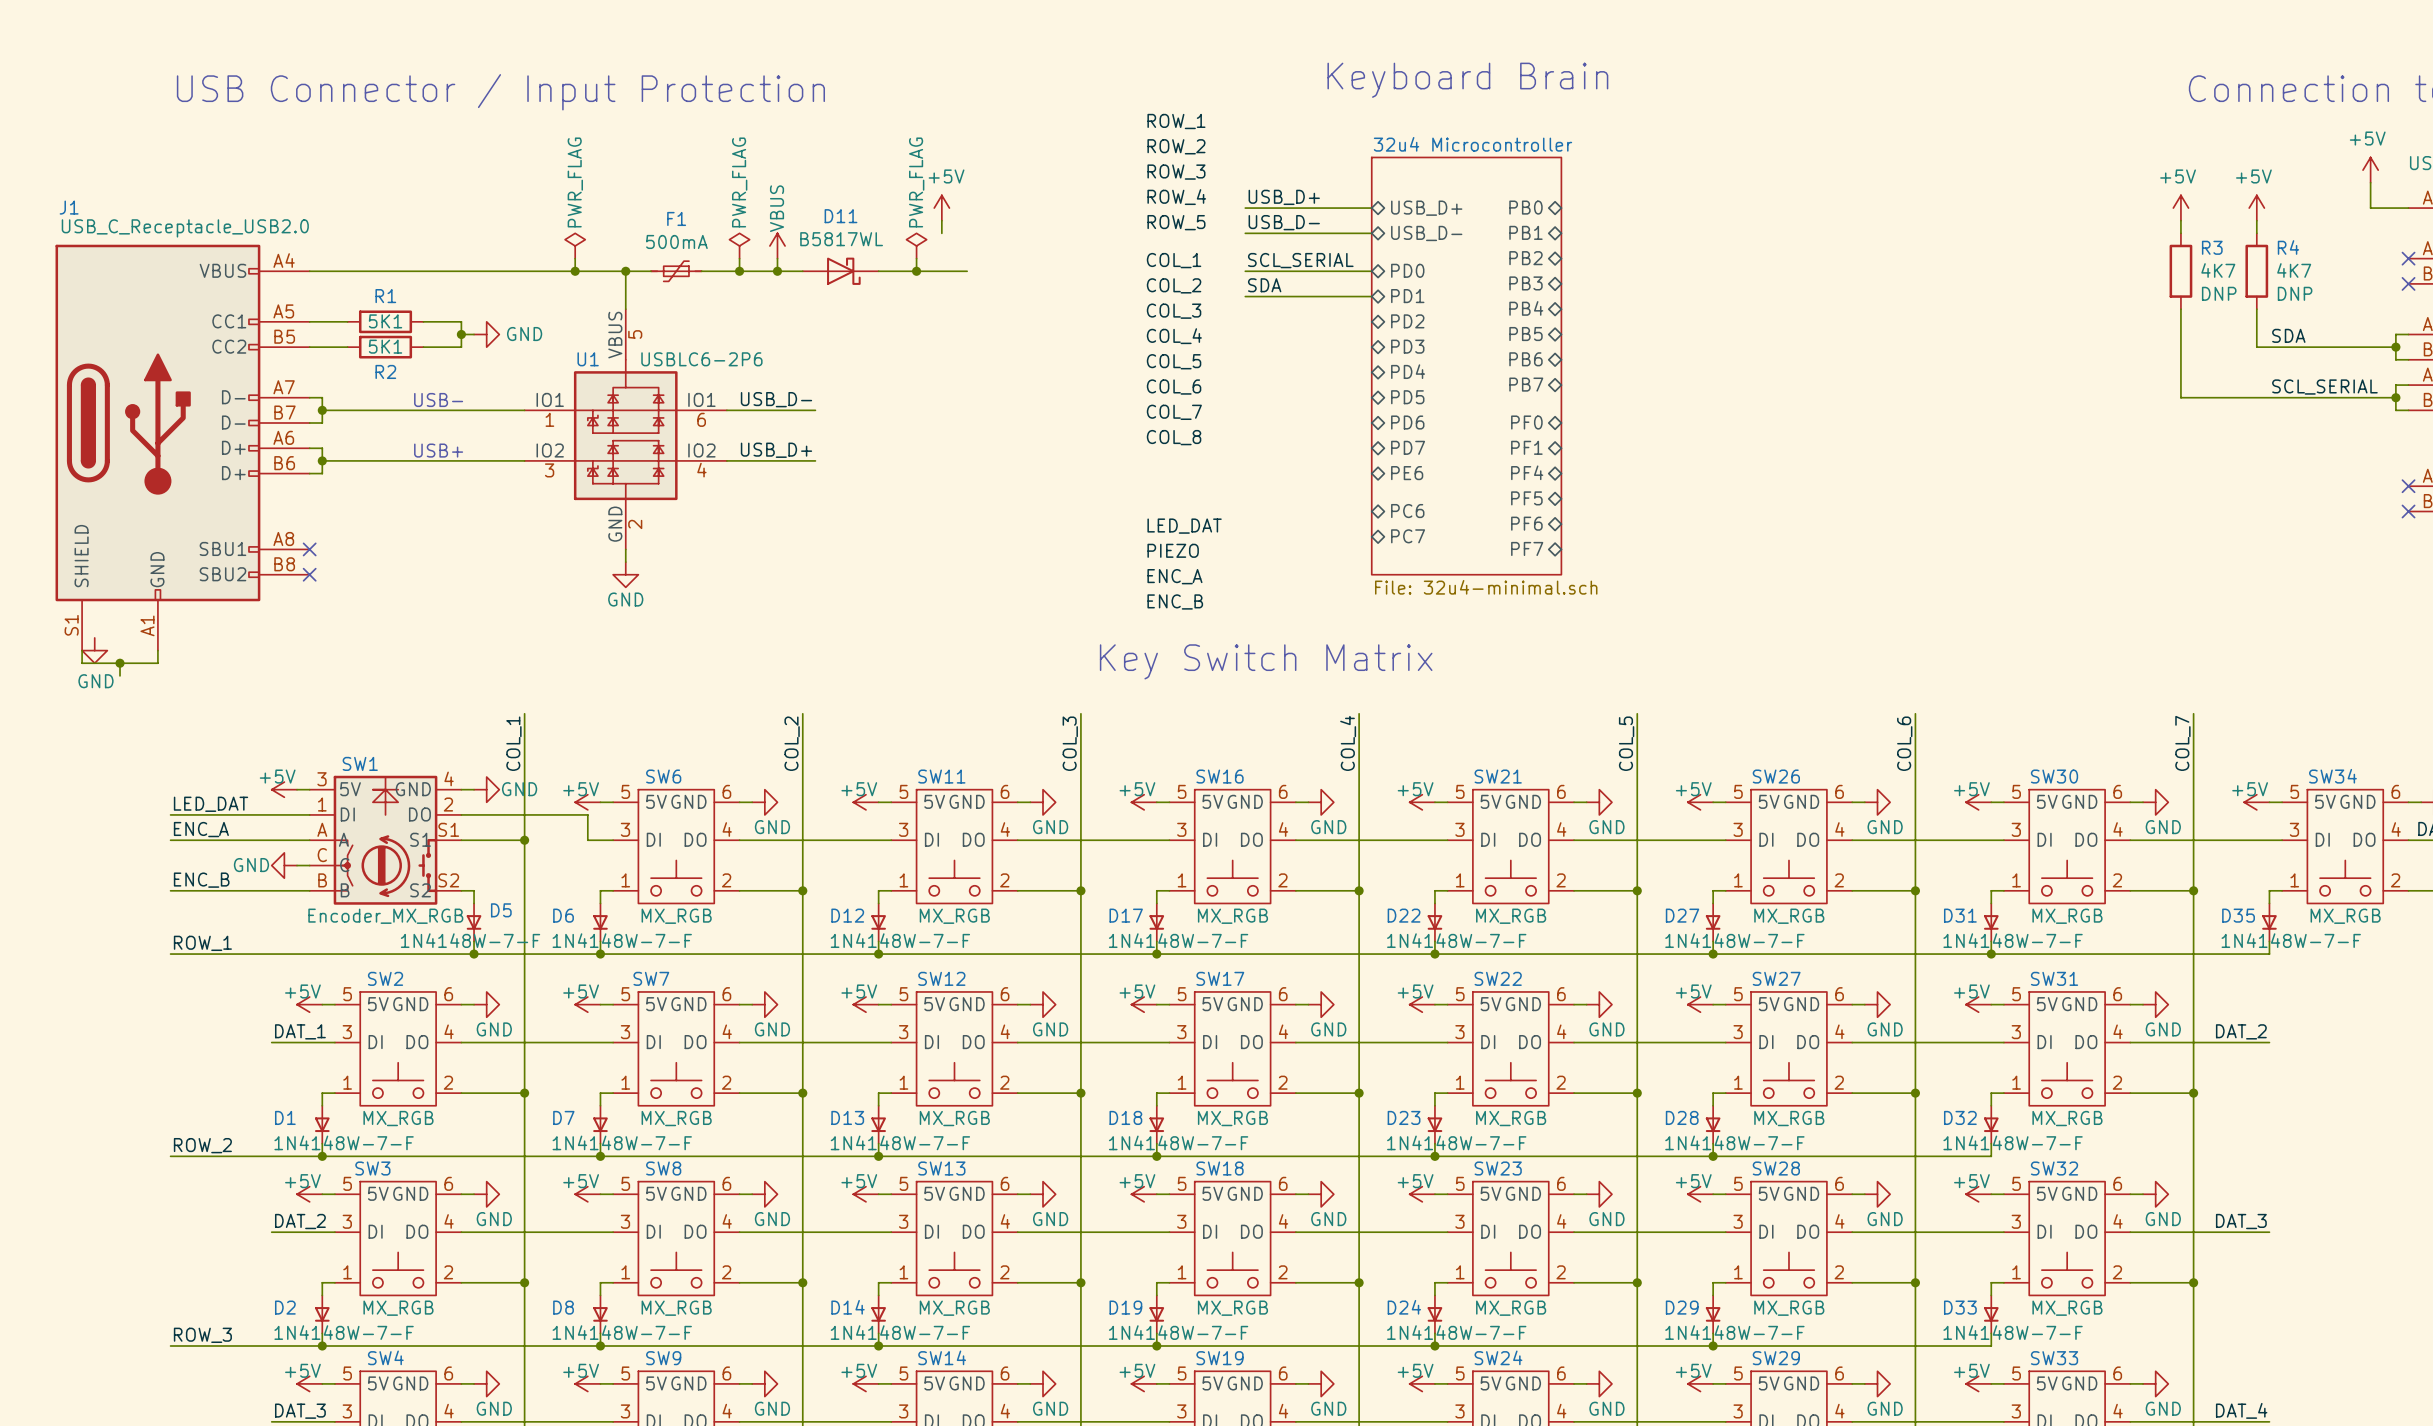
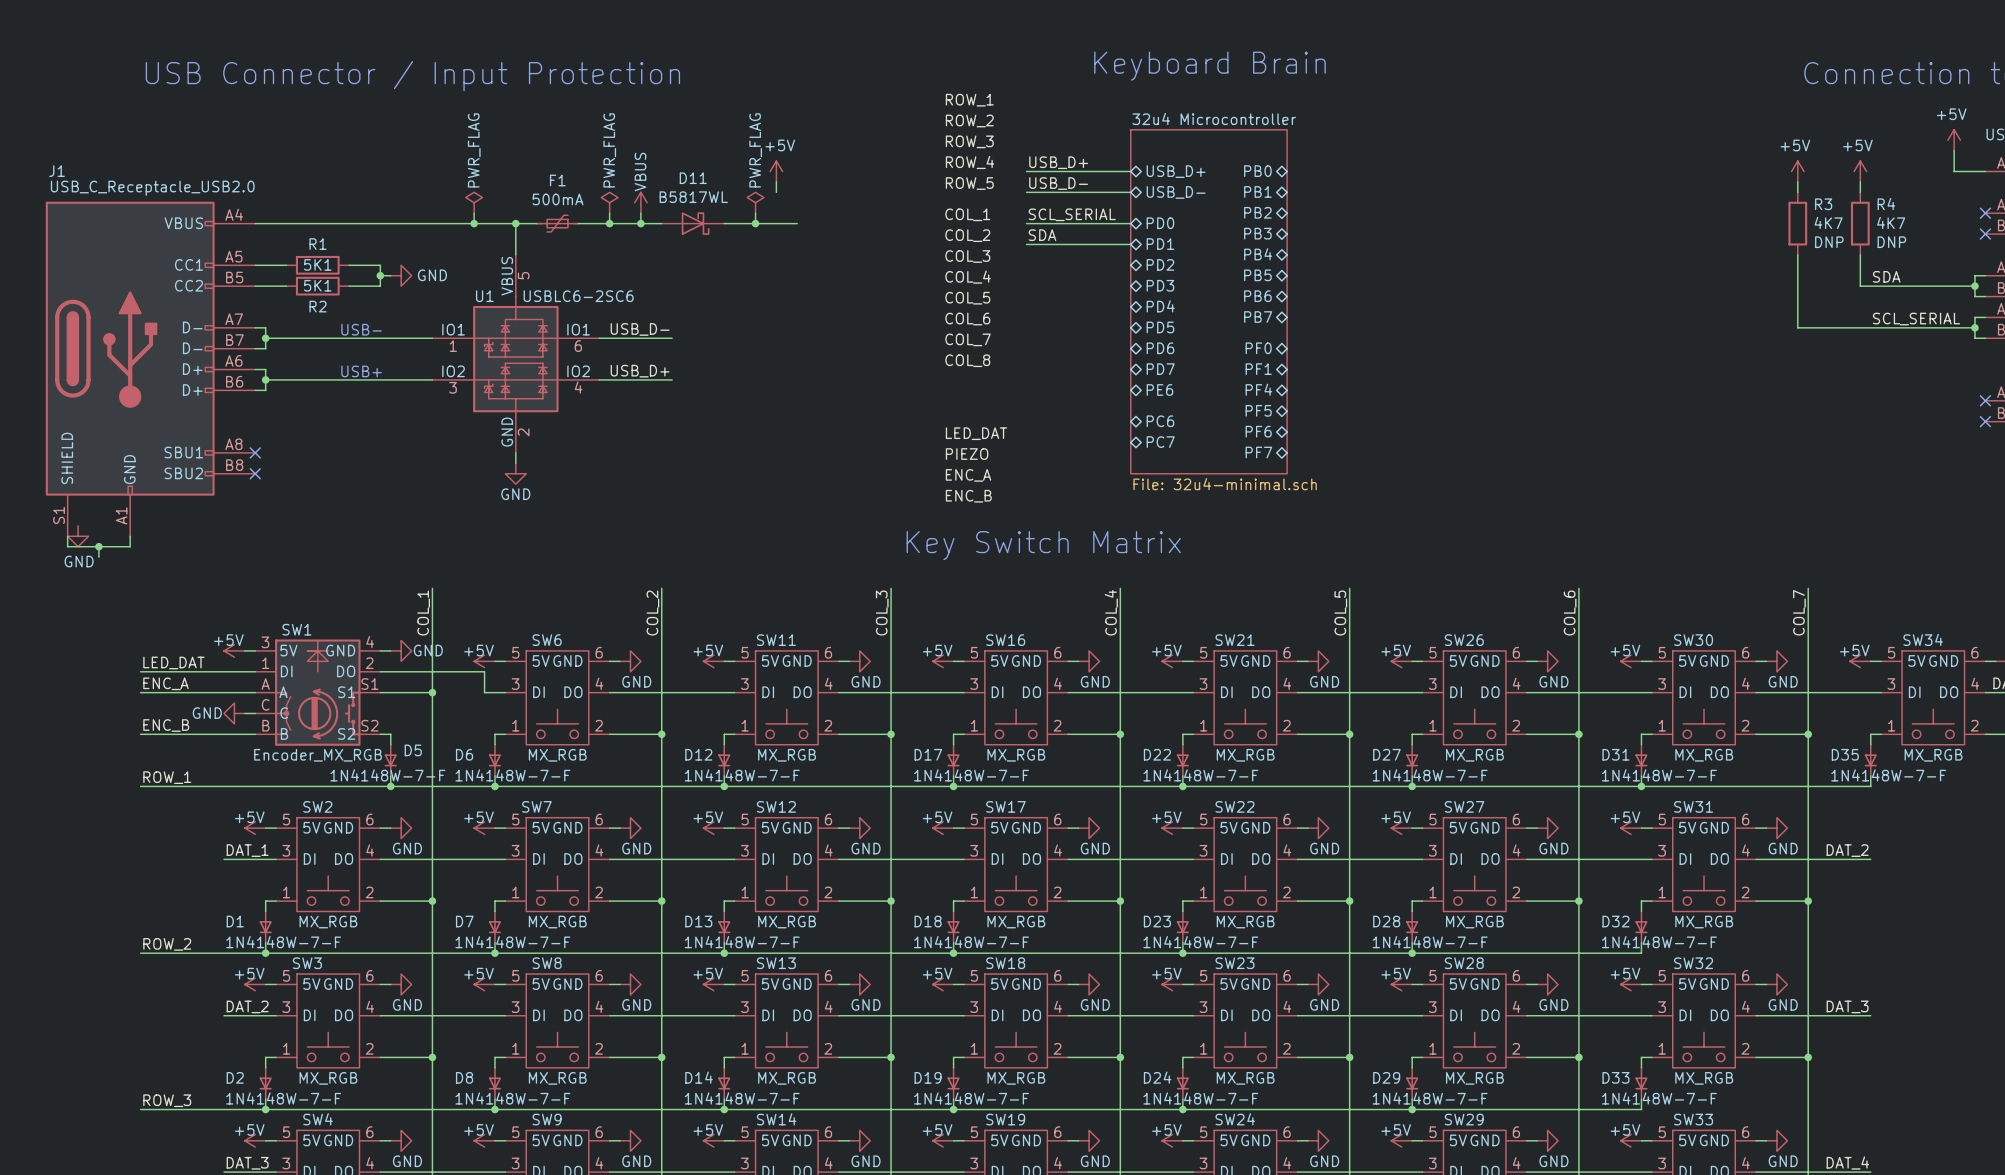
U1 value: USBLC6-2P6 (701, 359) -> USBLC6-2SC6 (578, 296)

